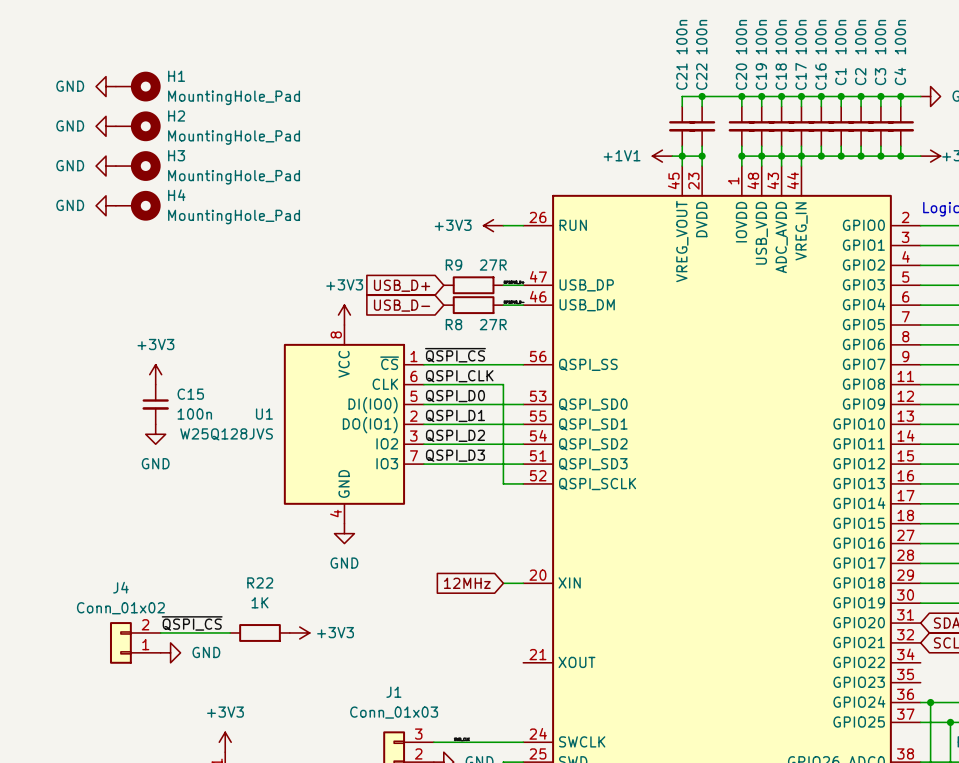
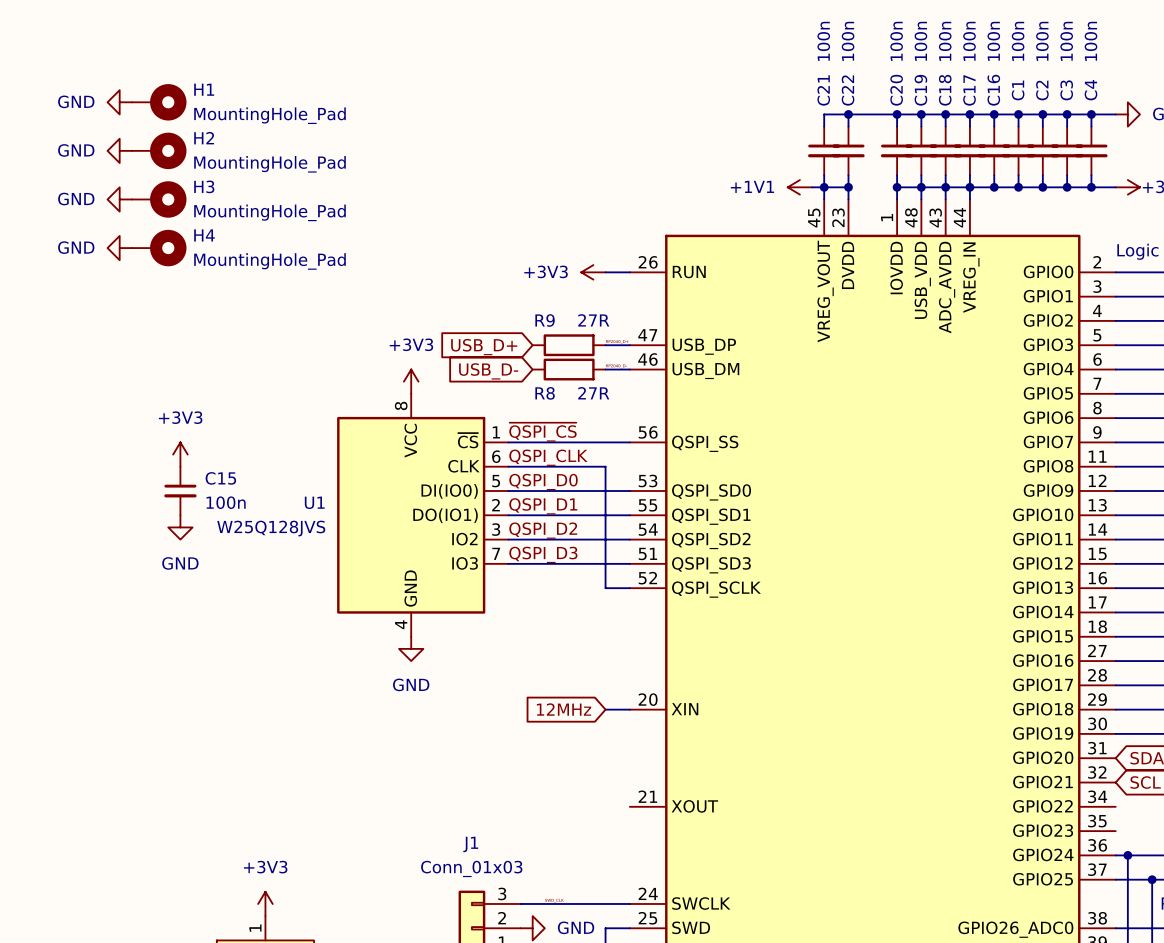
label: ~{QSPI_CS} (192, 623) -> none
wire: (160, 632) (230, 632) -> none
R22: 1K (260, 632) -> none
power symbol: +3V3 (299, 632) -> none
J4: Conn_01x02 (135, 642) -> none
power symbol: GND (170, 652) -> none

